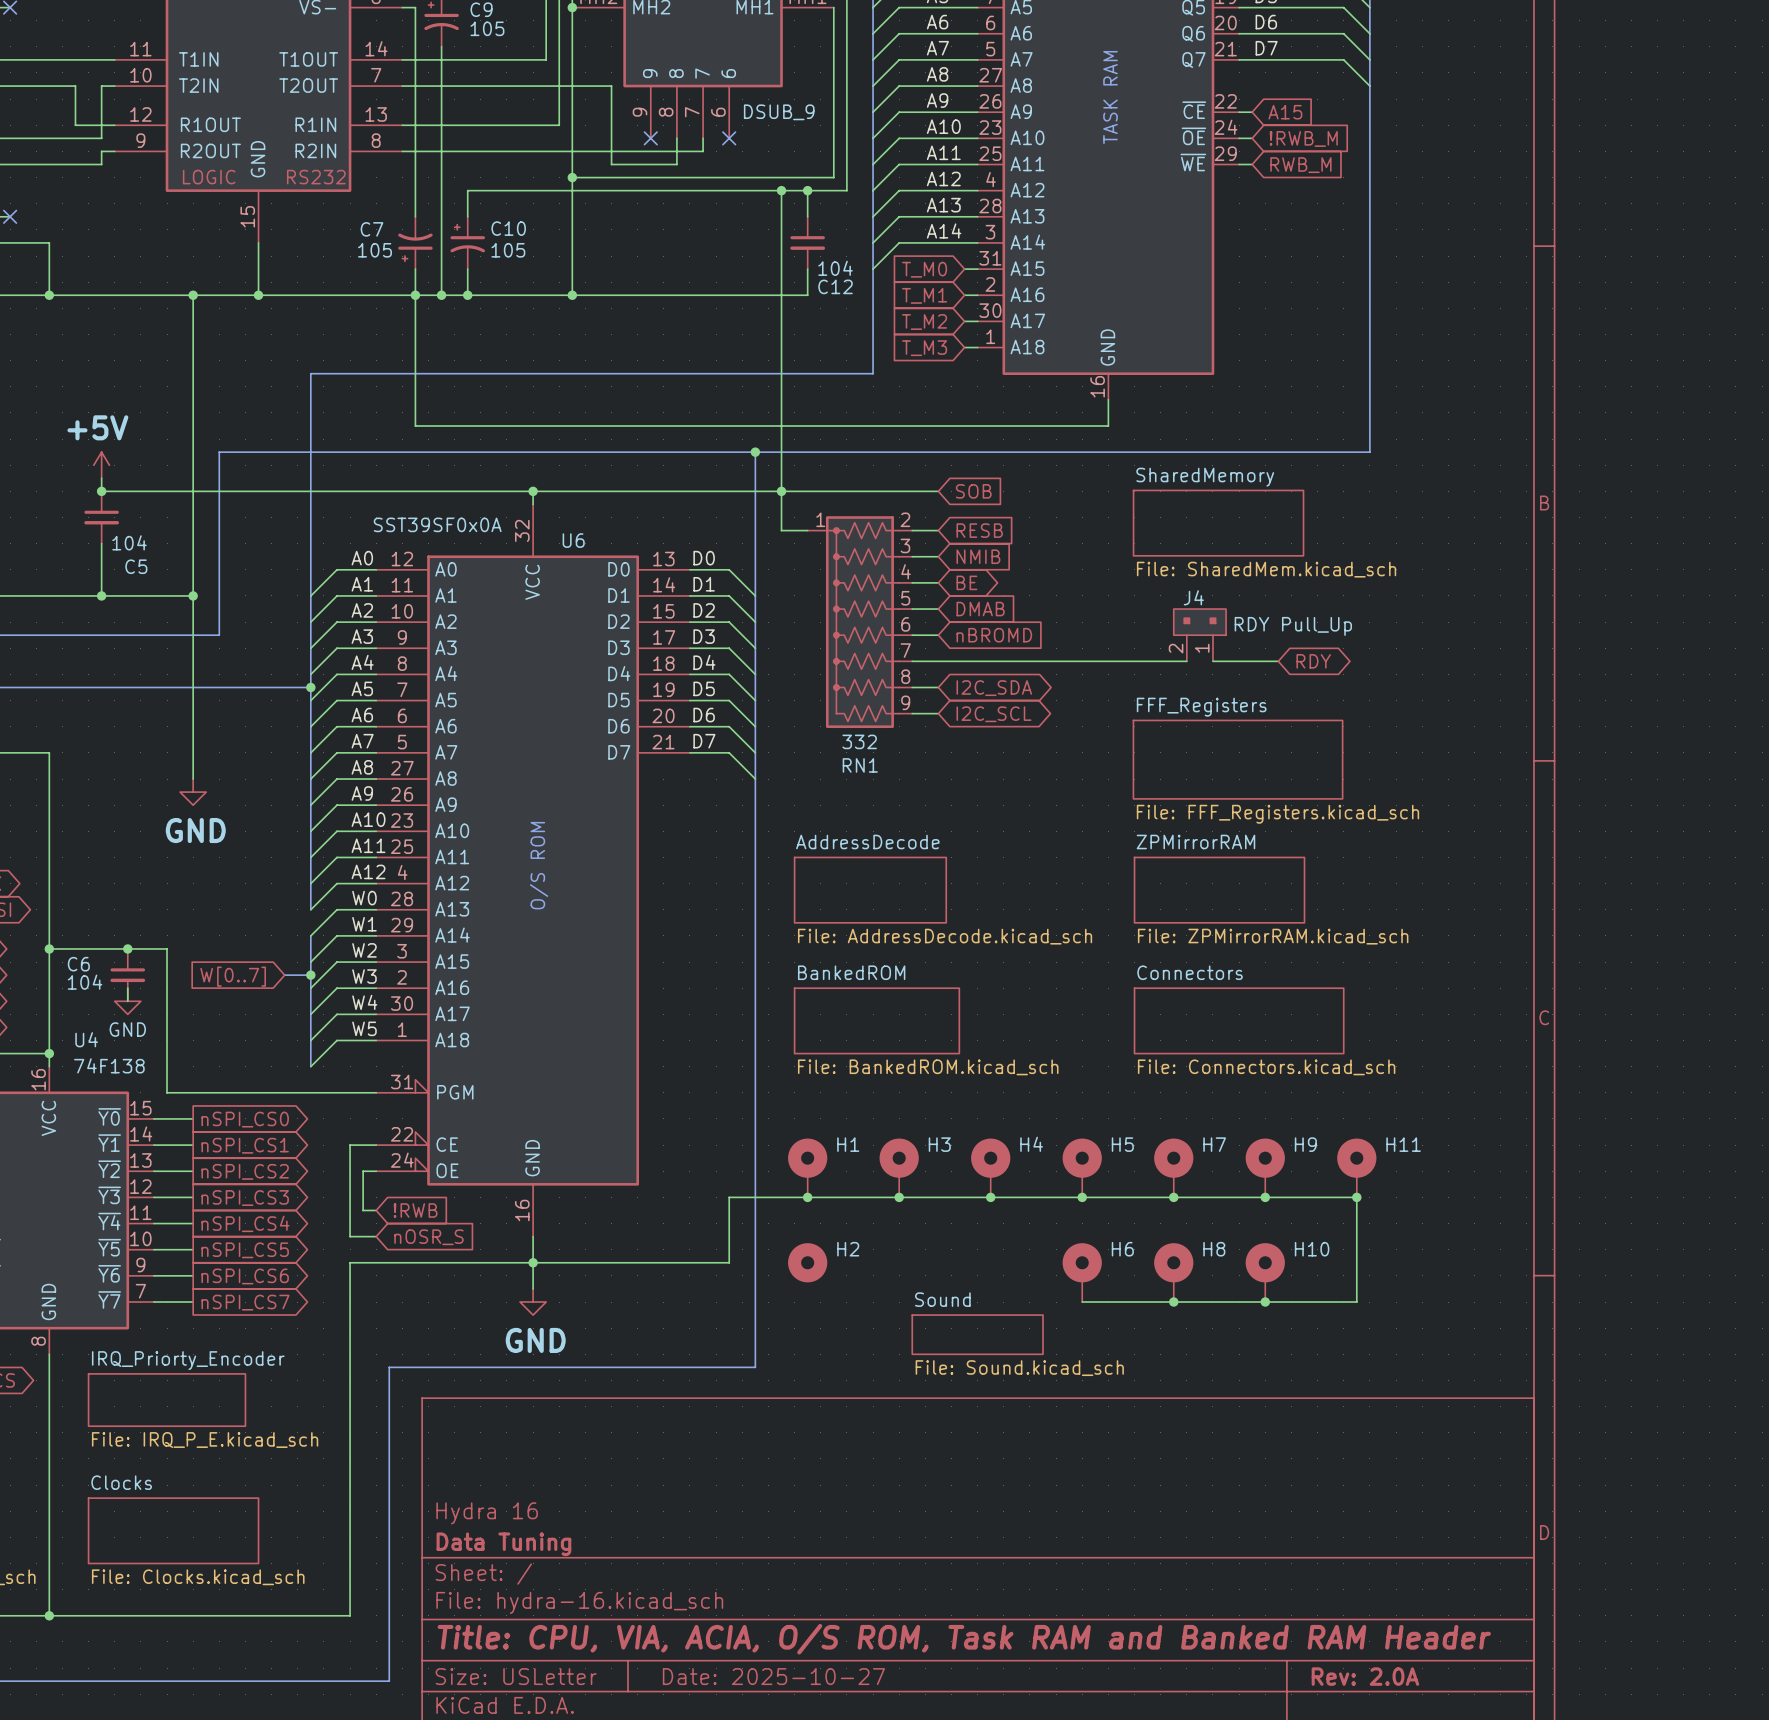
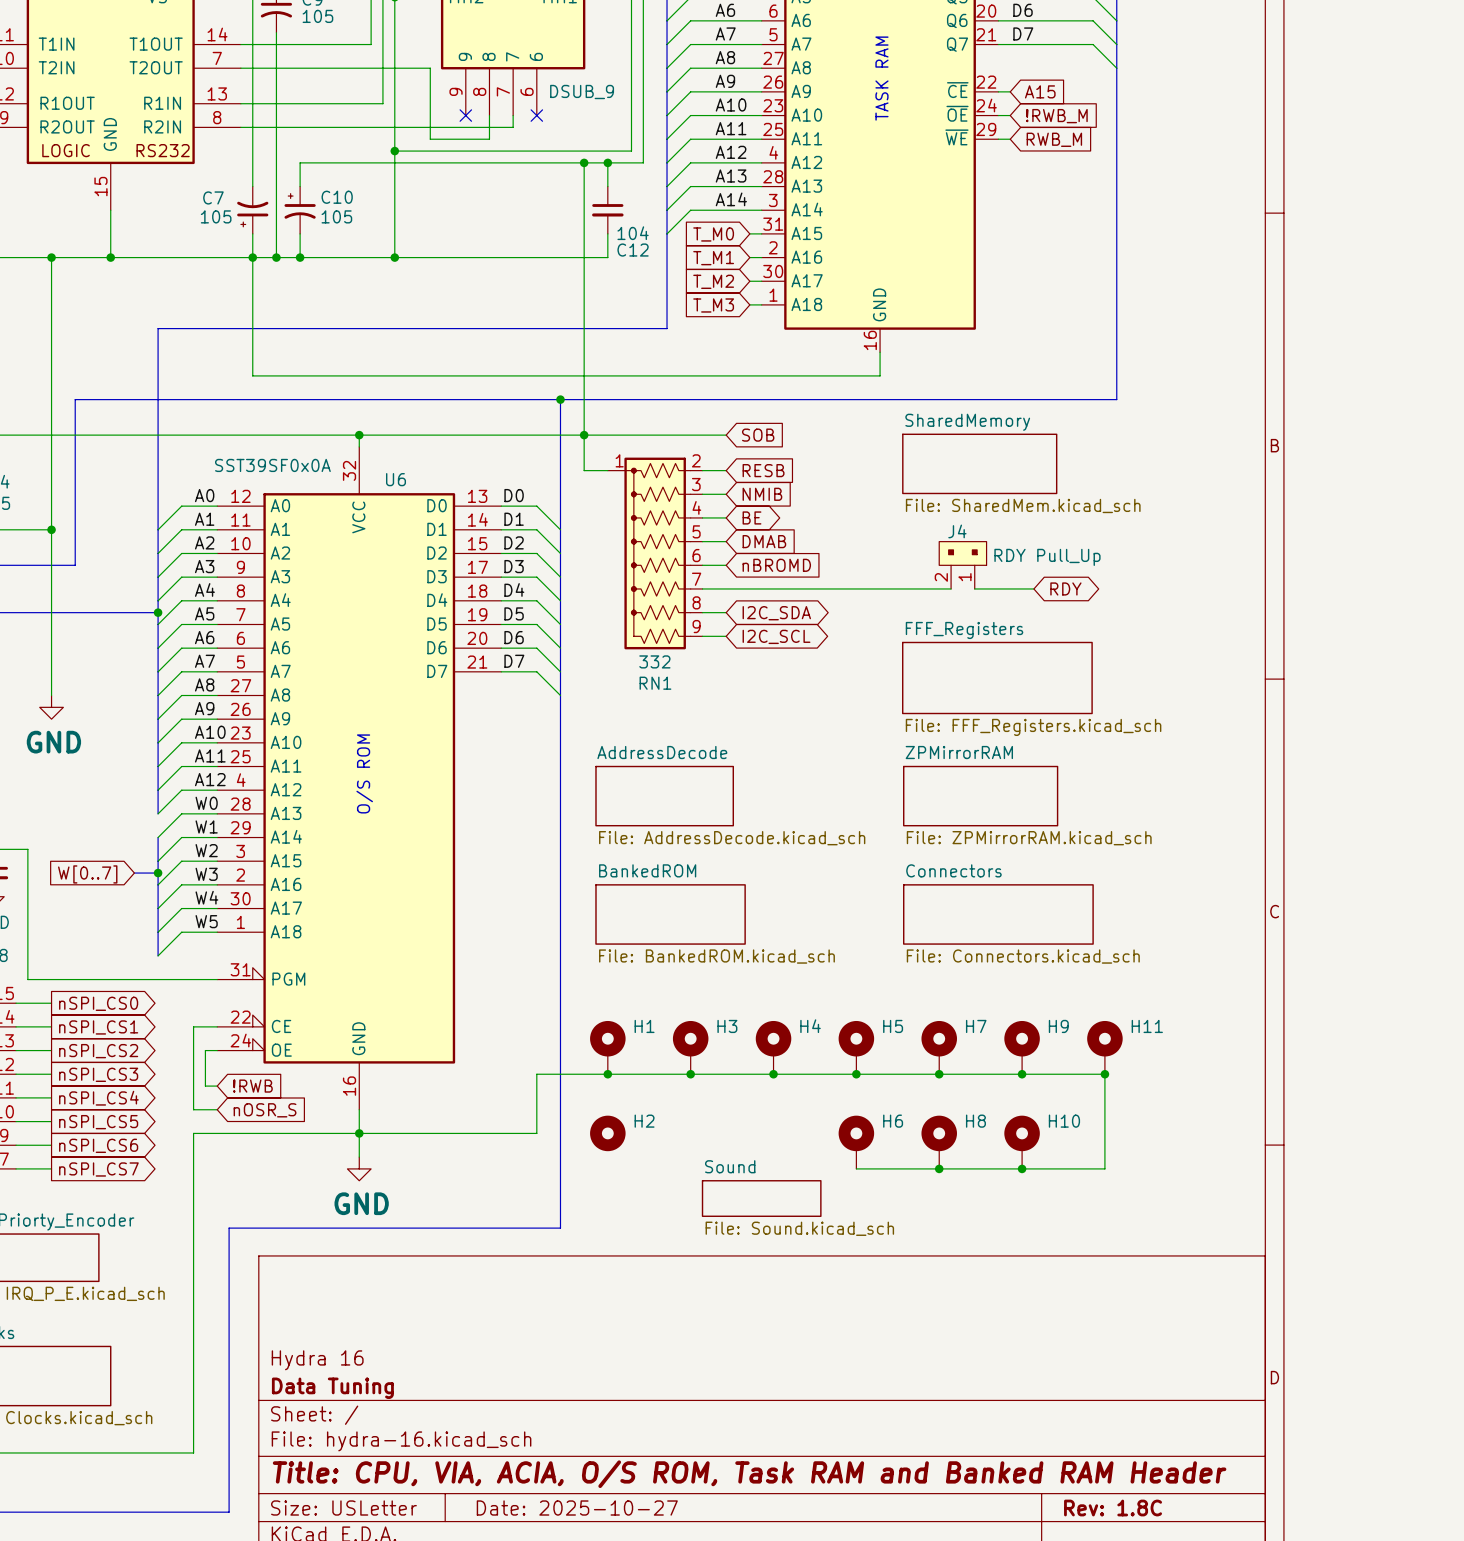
title block: Rev: 2.0A (1365, 1676) -> Rev: 1.8C (1113, 1508)

